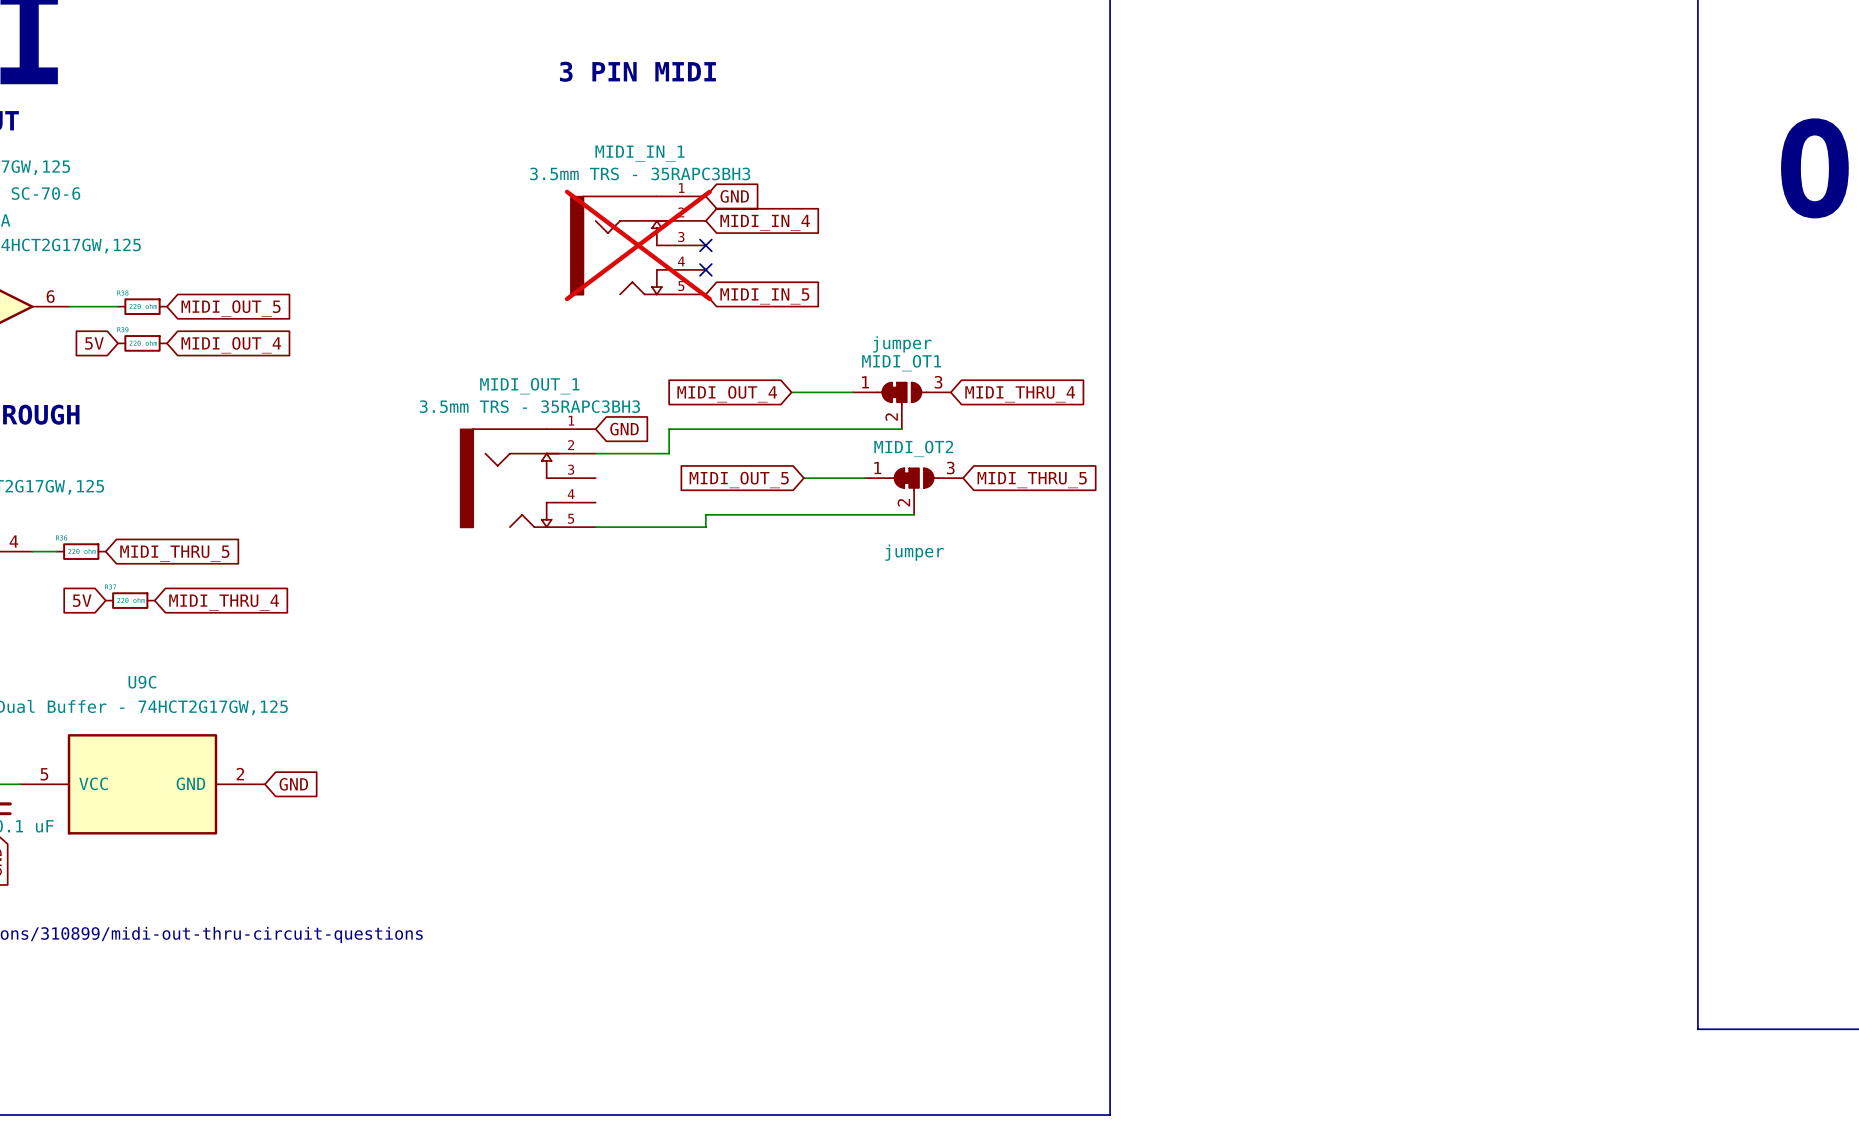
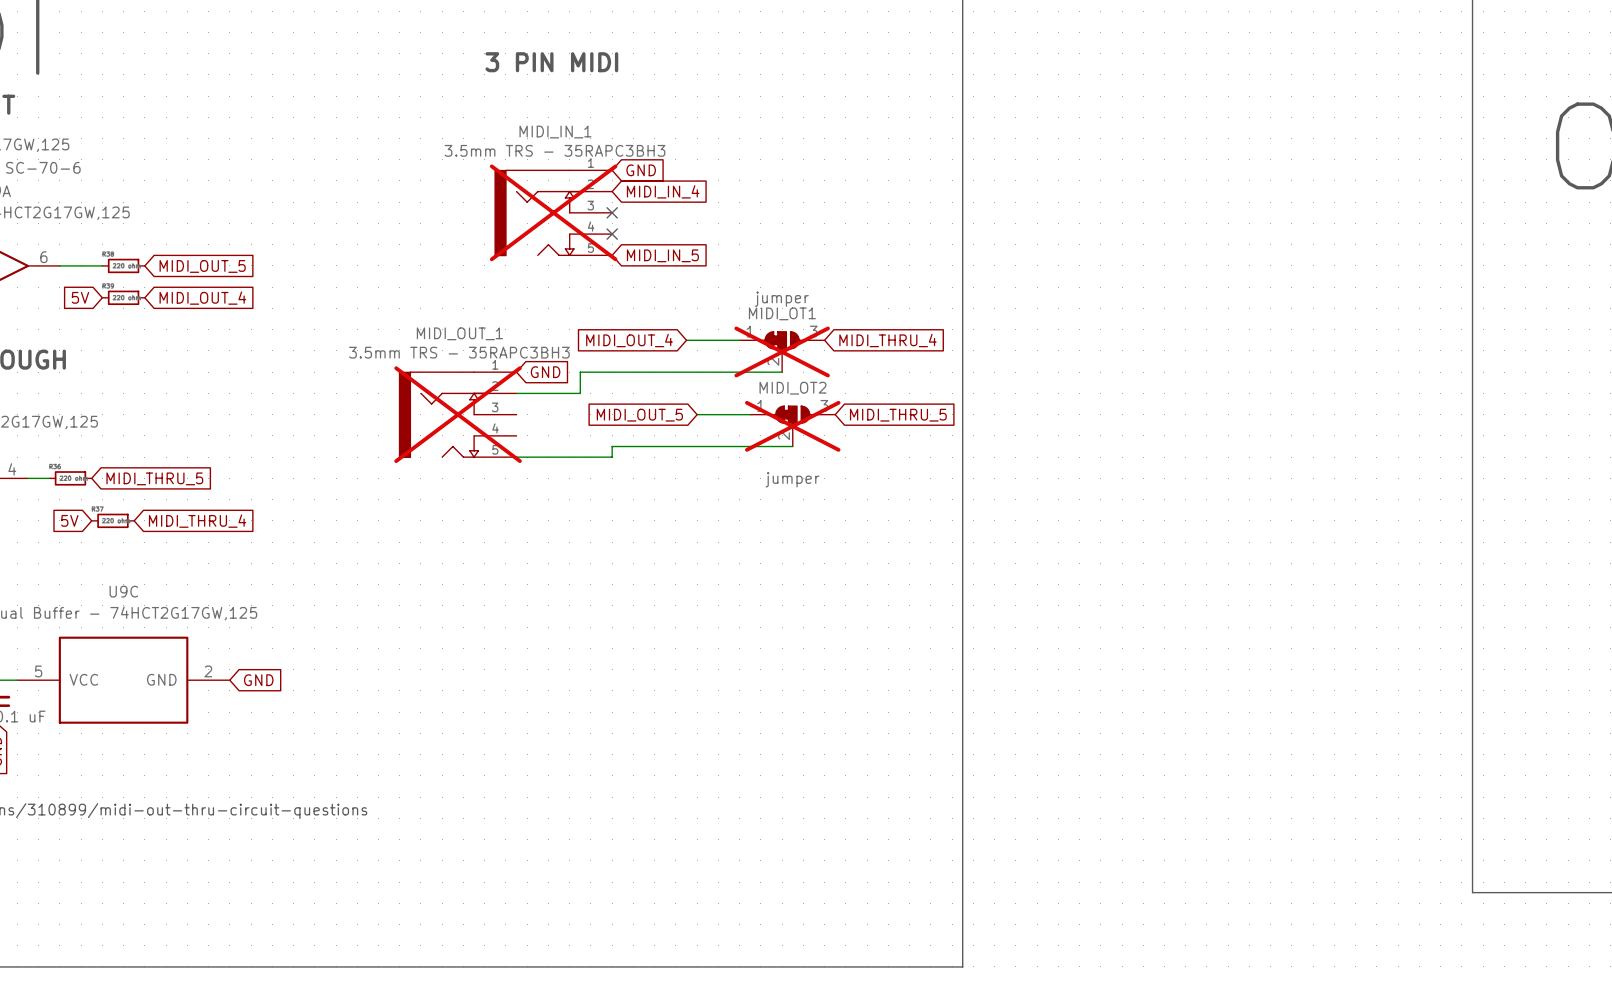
MIDI_OT1 do-not-place cross: none -> (782, 351)
MIDI_OUT_1 do-not-place cross: none -> (458, 414)
MIDI_OT2 do-not-place cross: none -> (792, 426)

